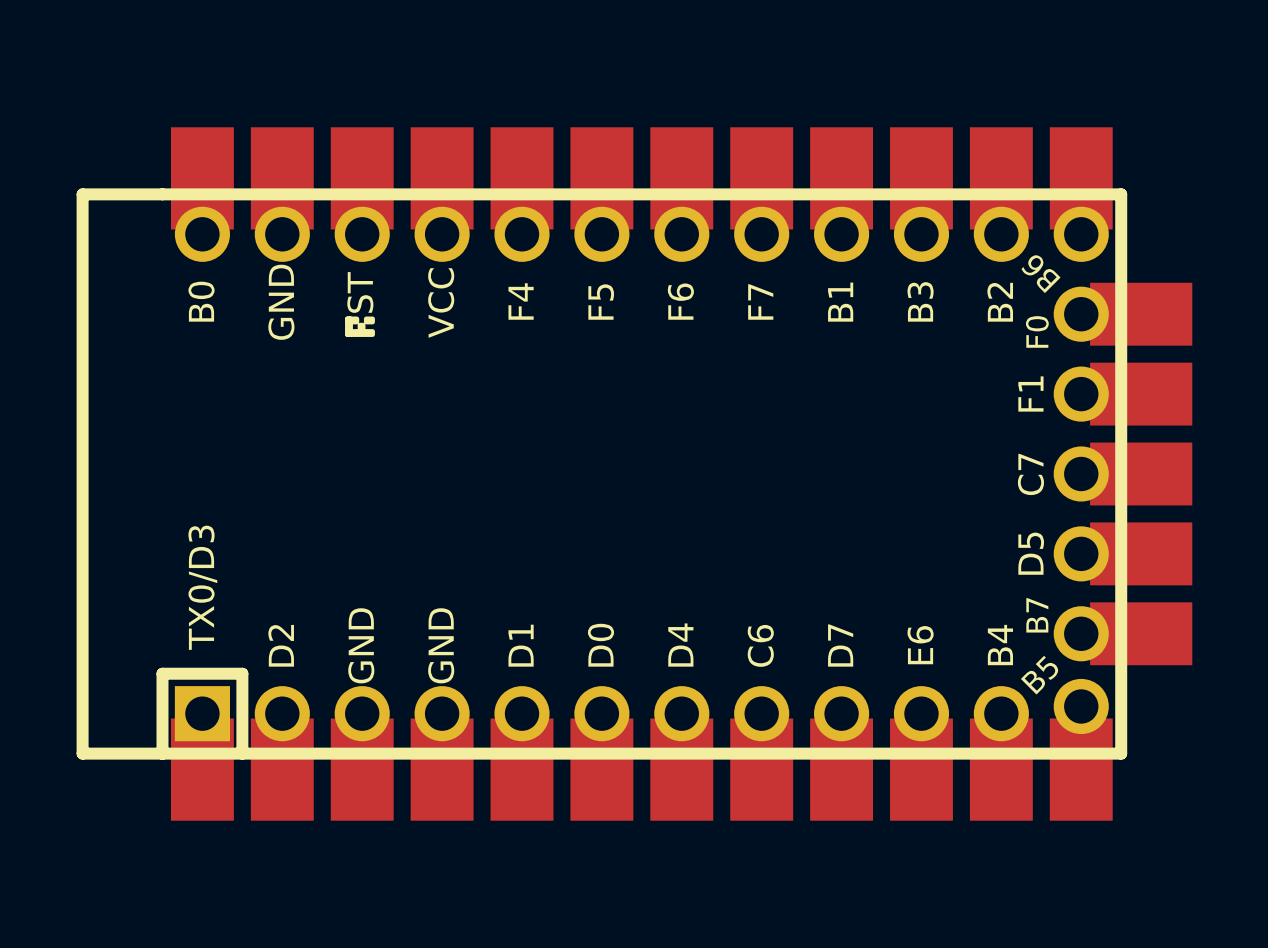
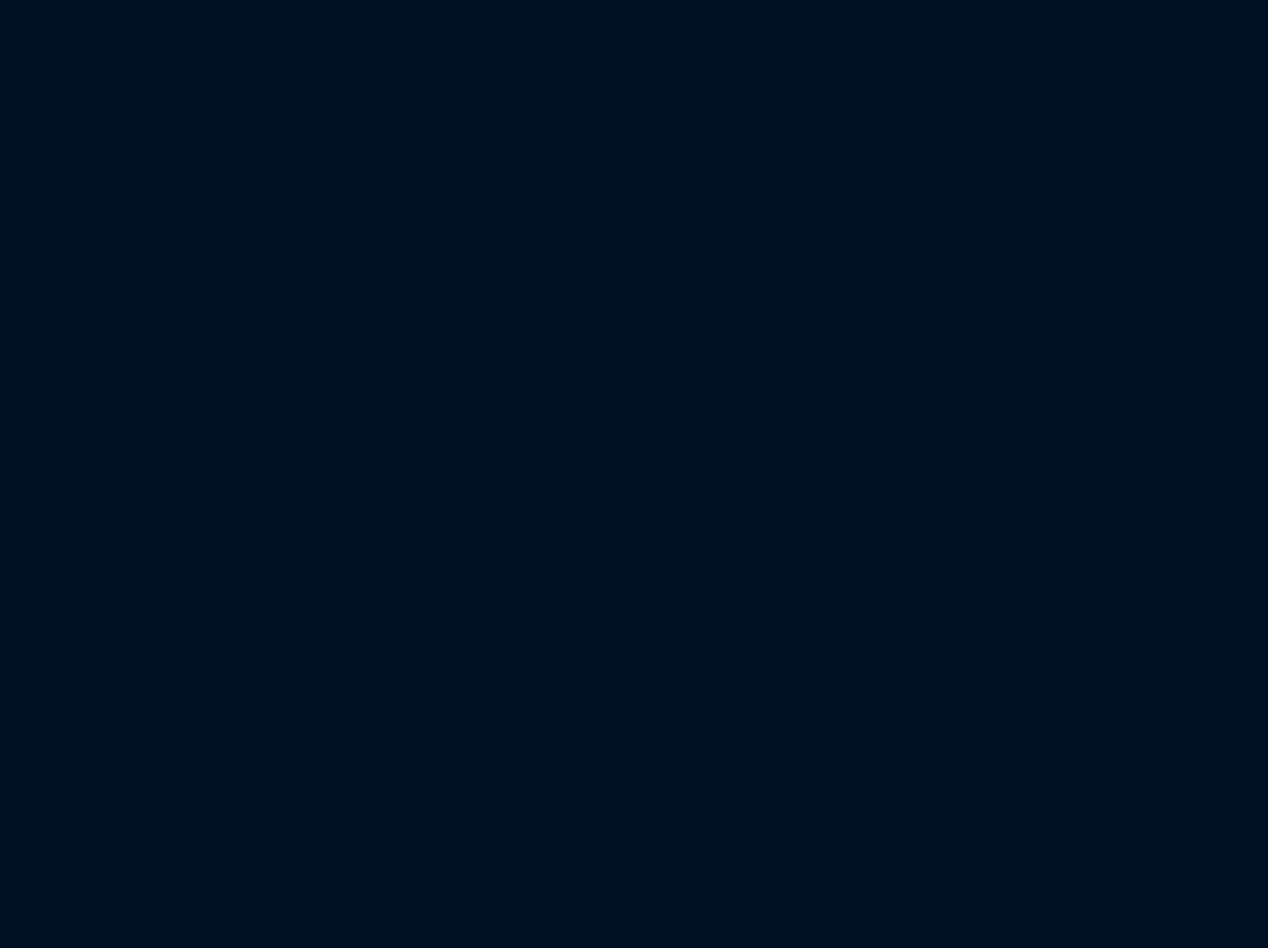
part: (634, 473) -> none

